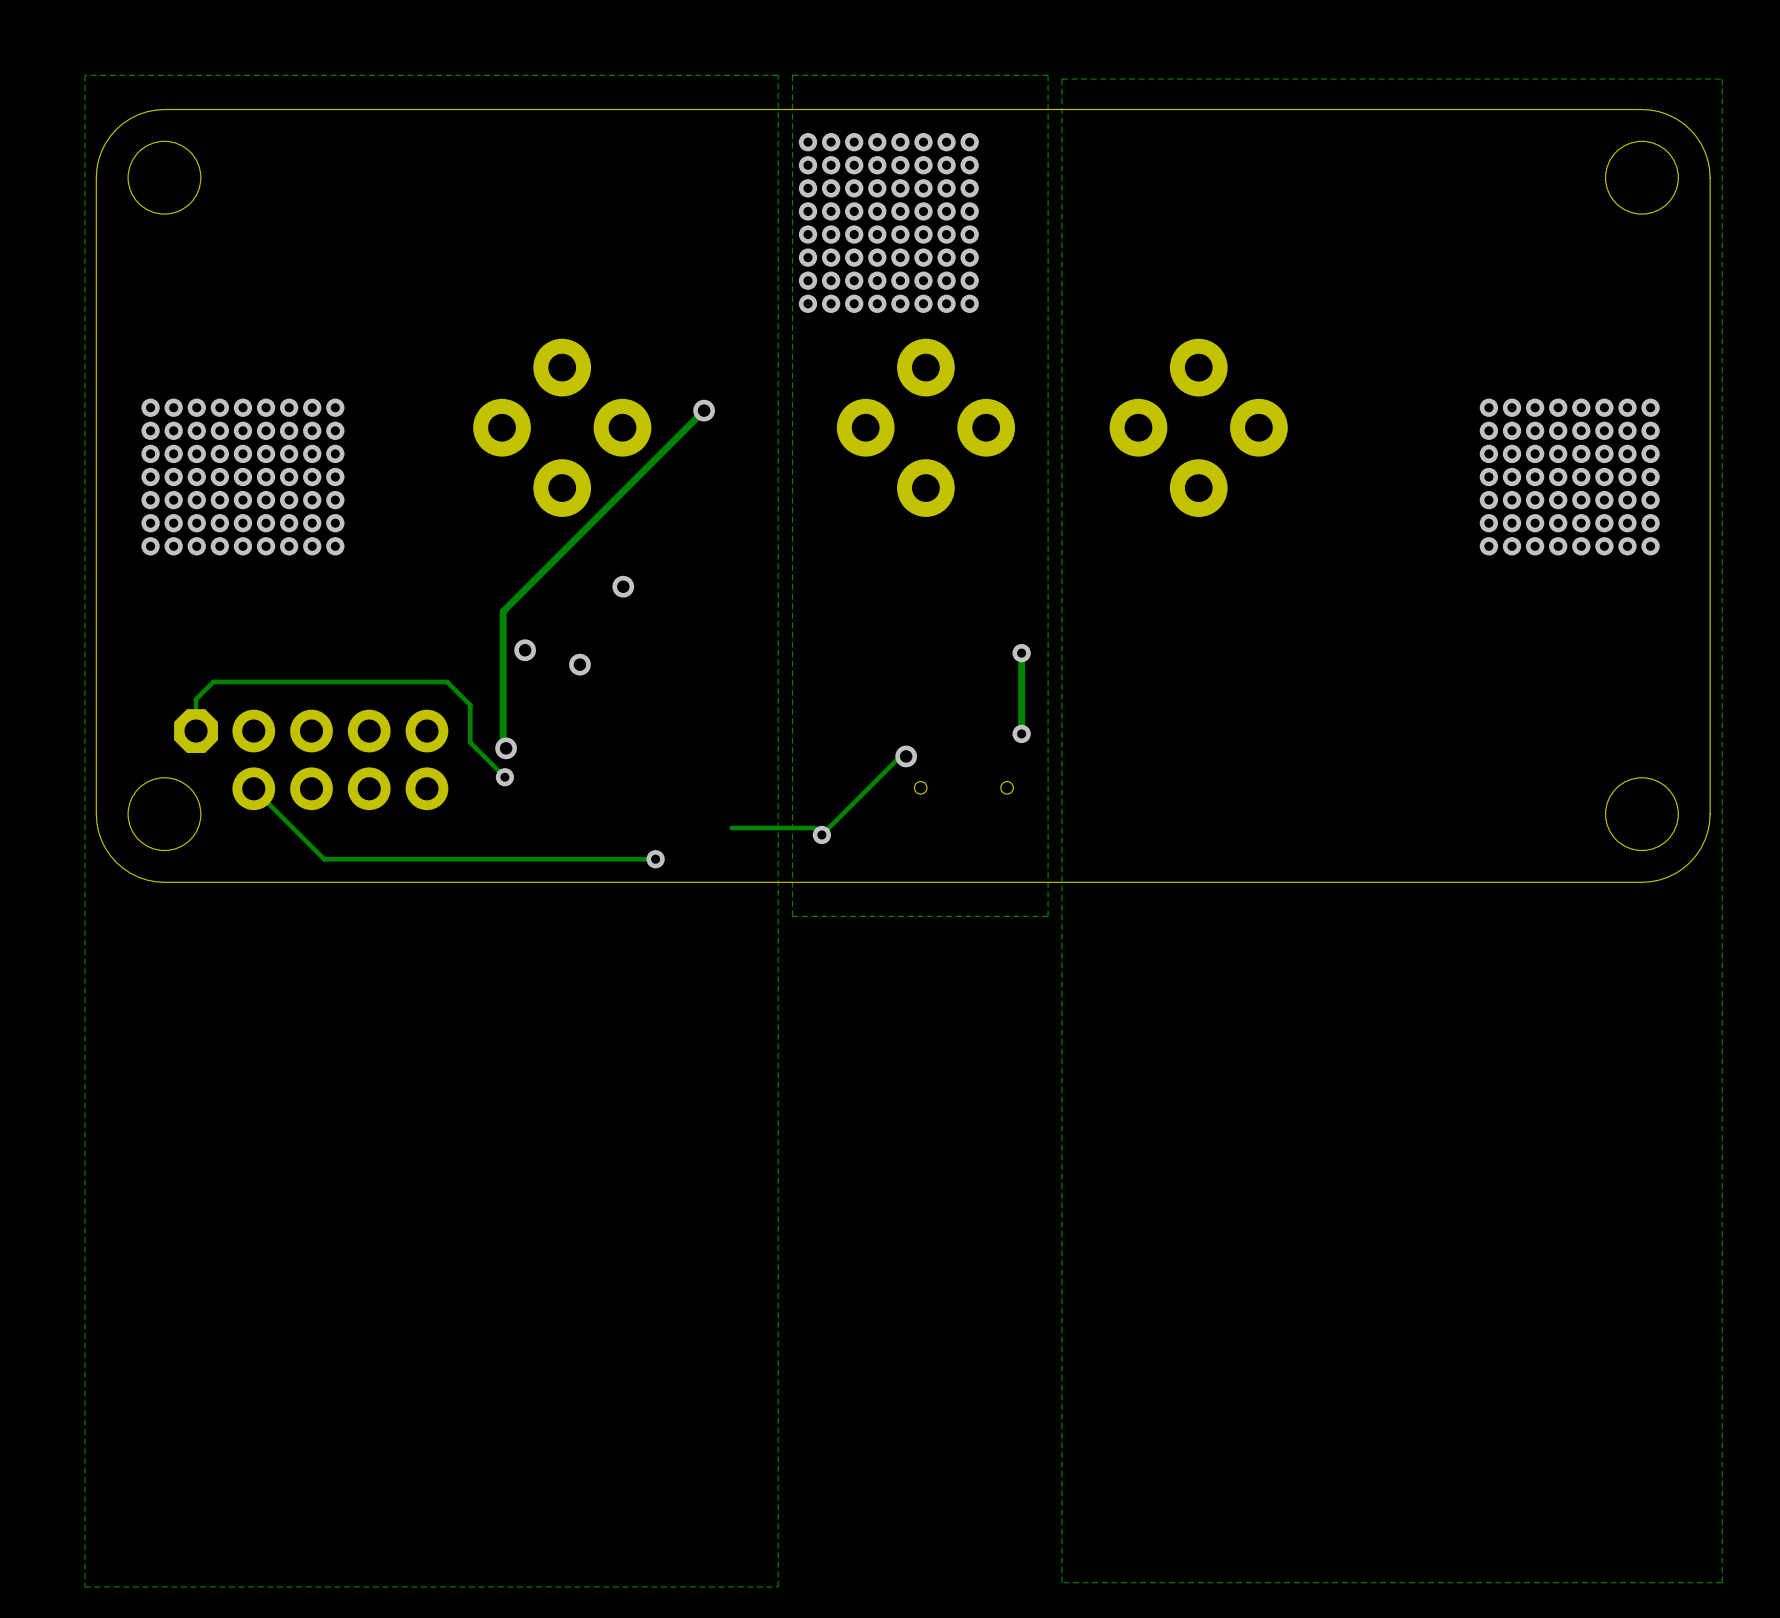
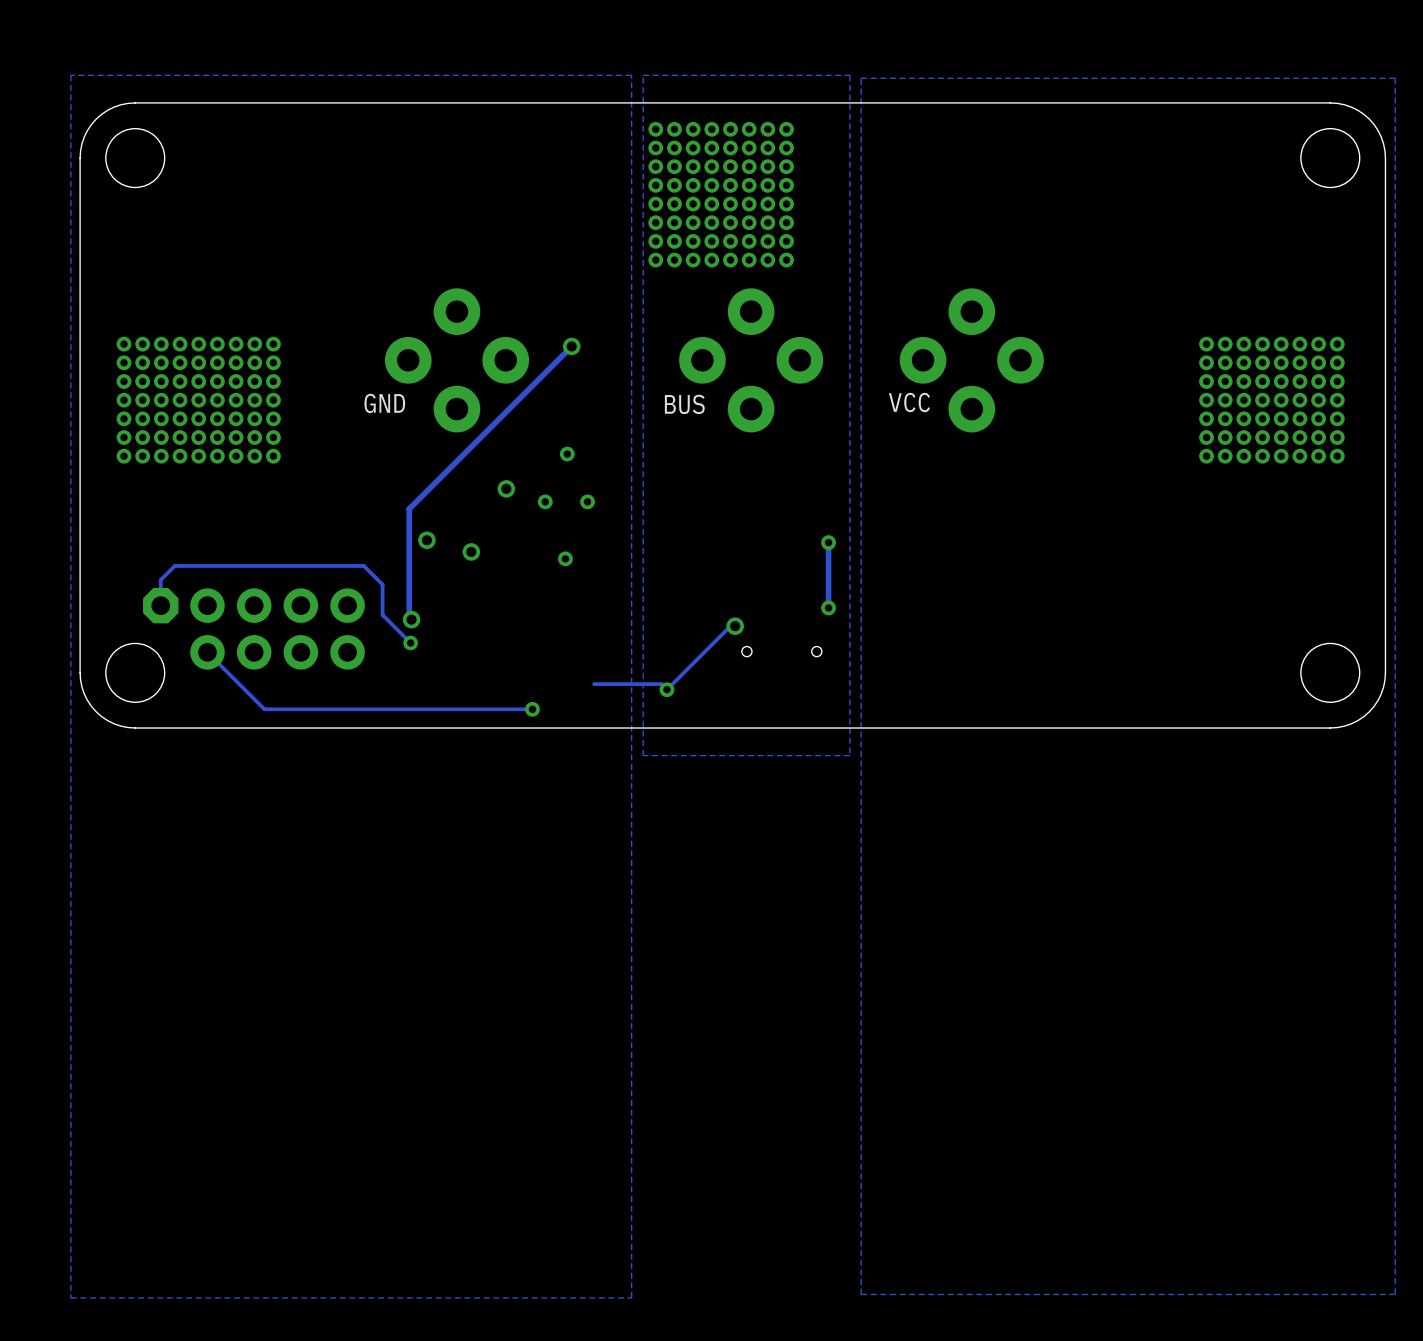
text: none -> VCC (909, 402)
text: none -> GND (384, 403)
text: none -> BUS (684, 404)
via: none -> (567, 454)
via: none -> (545, 501)
via: none -> (587, 501)
via: none -> (565, 558)

